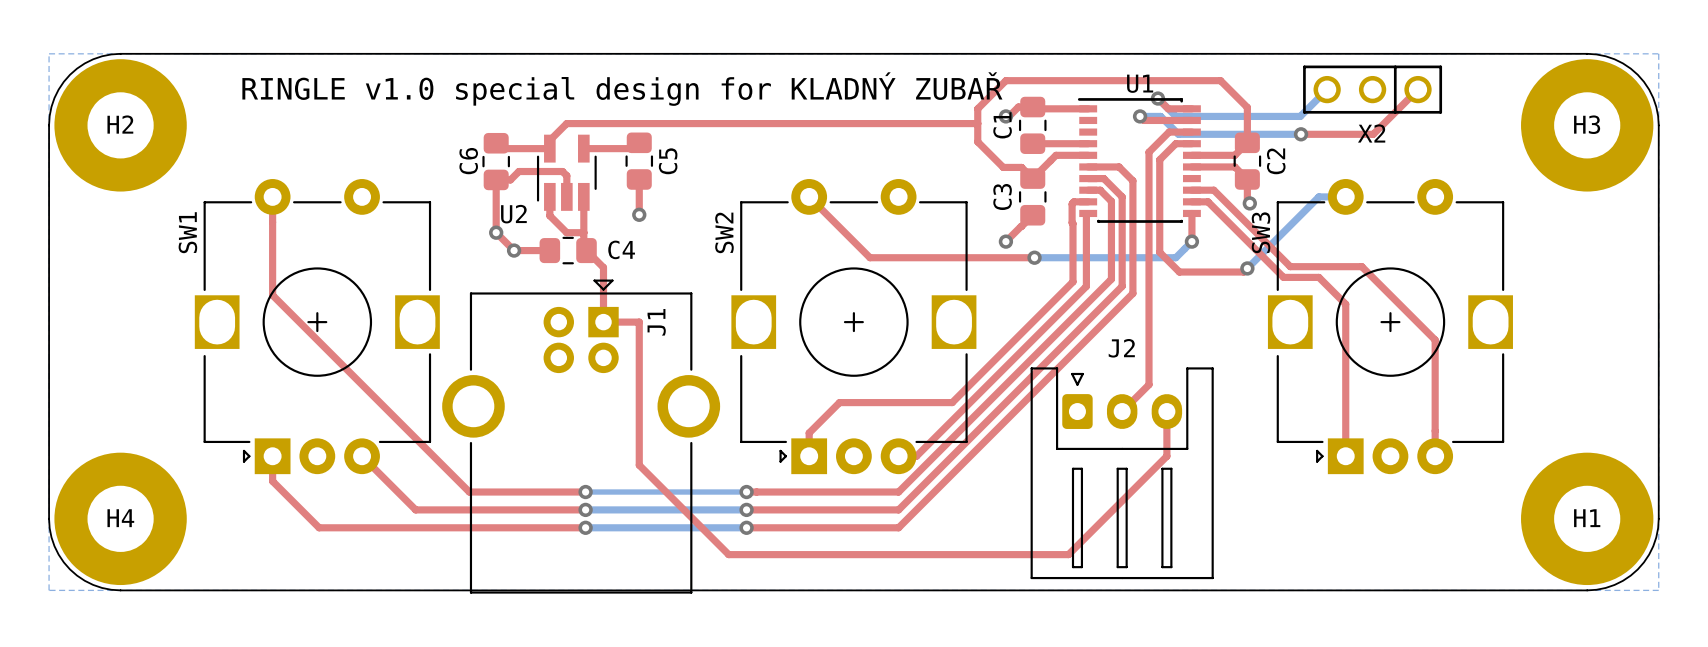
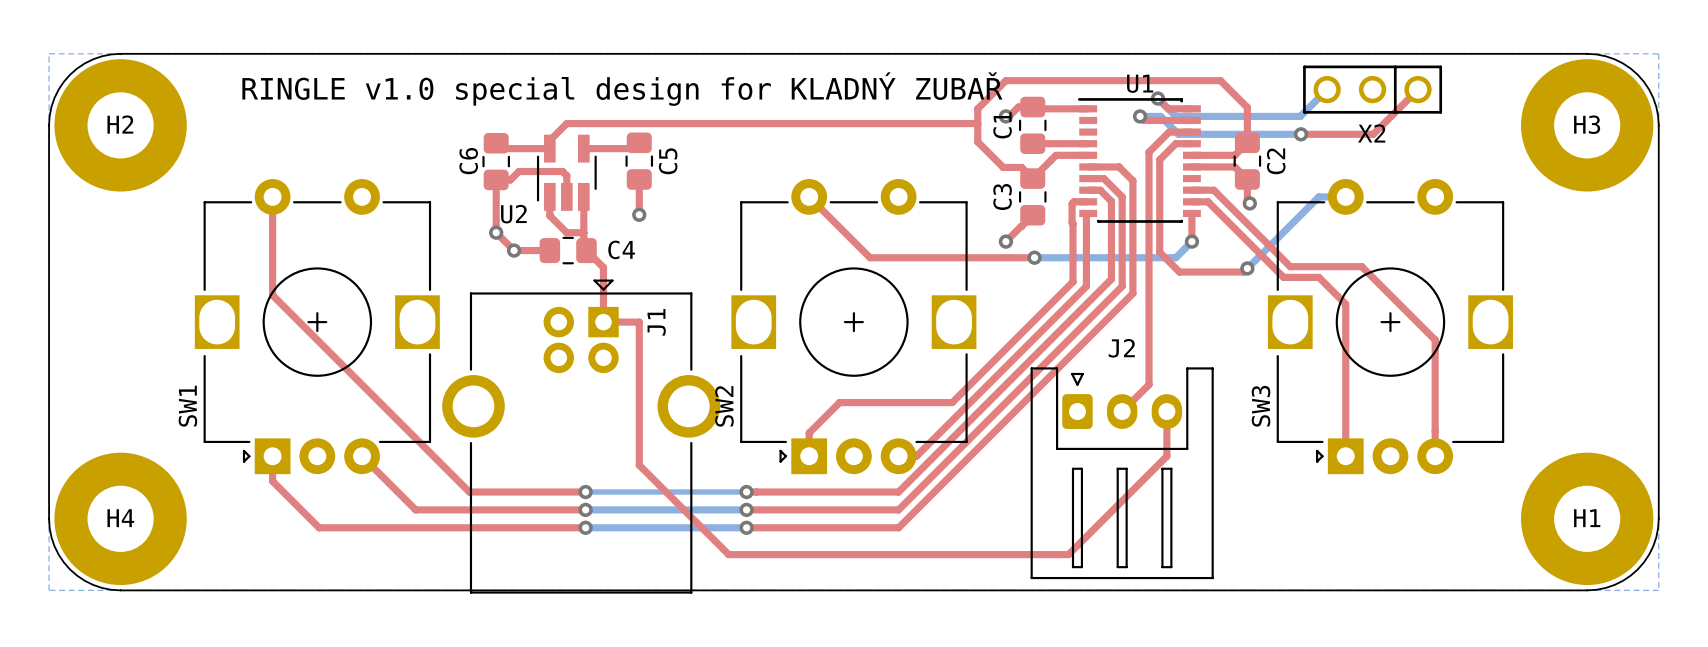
SW1 name position: SW1 (187, 232) -> SW1 (187, 406)
SW2 name position: SW2 (724, 232) -> SW2 (724, 406)
SW3 name position: SW3 (1261, 232) -> SW3 (1261, 406)

